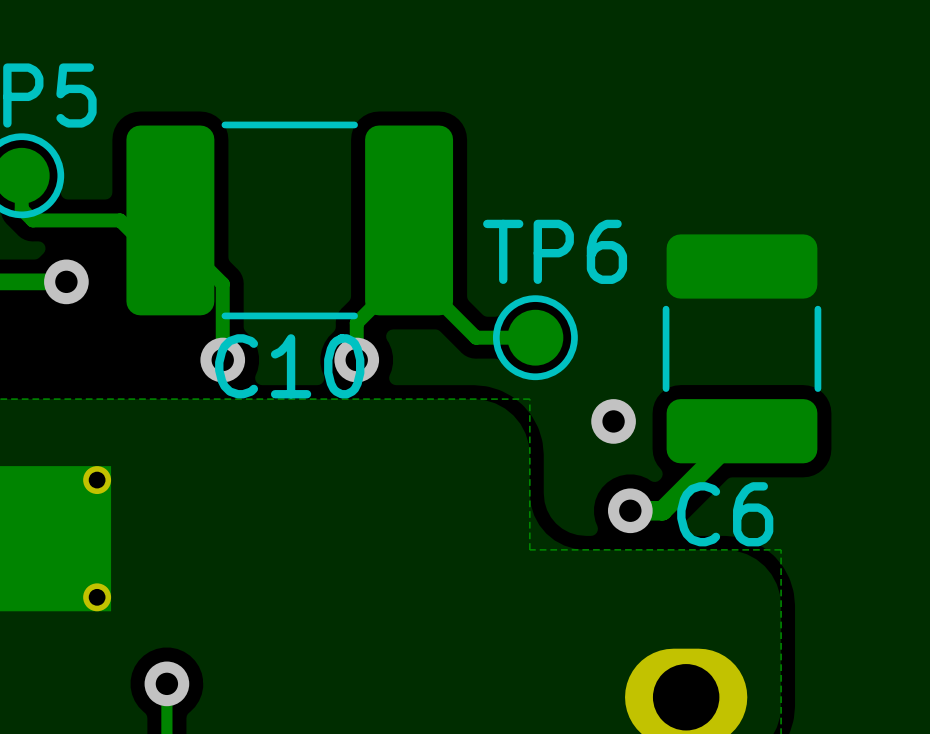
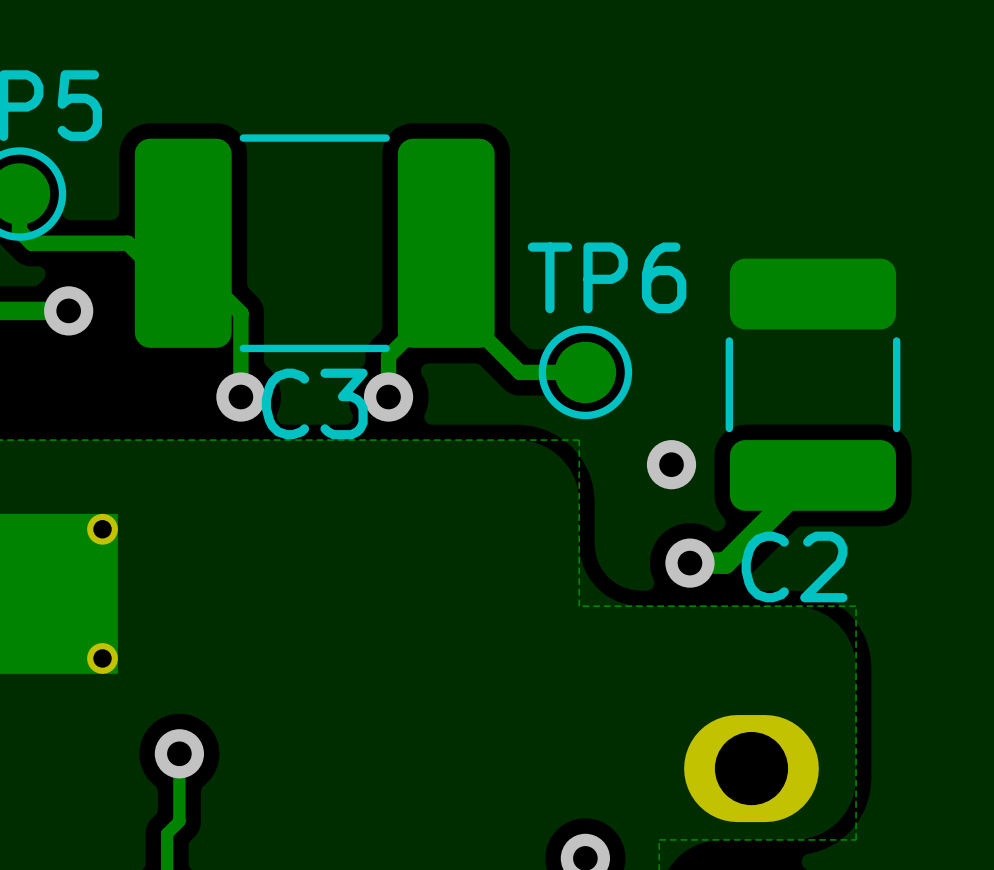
C10 name: C10 (289, 366) -> C3 (314, 403)
C6 name: C6 (725, 514) -> C2 (794, 566)

